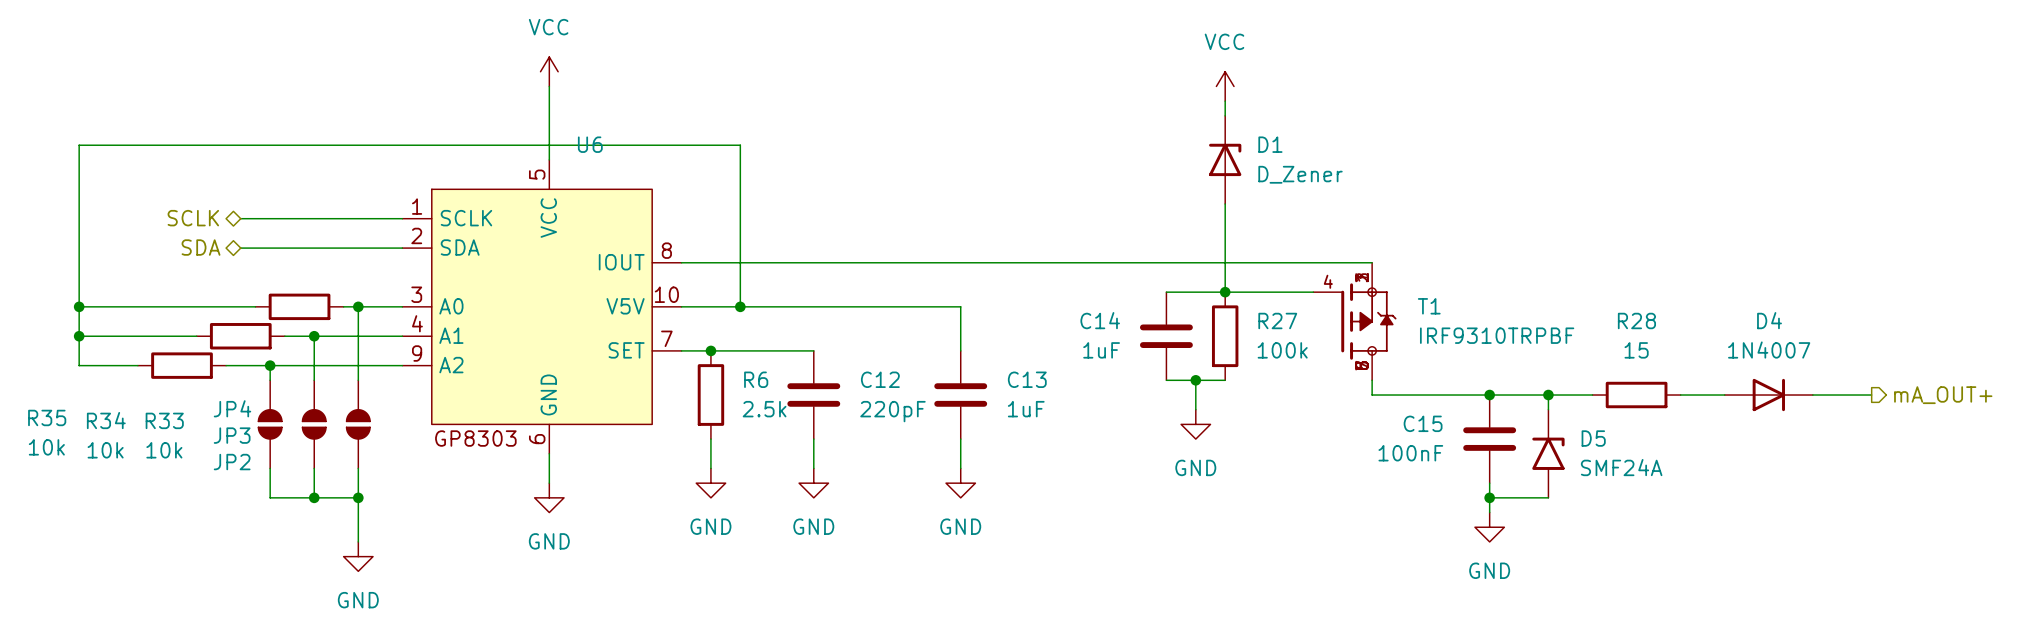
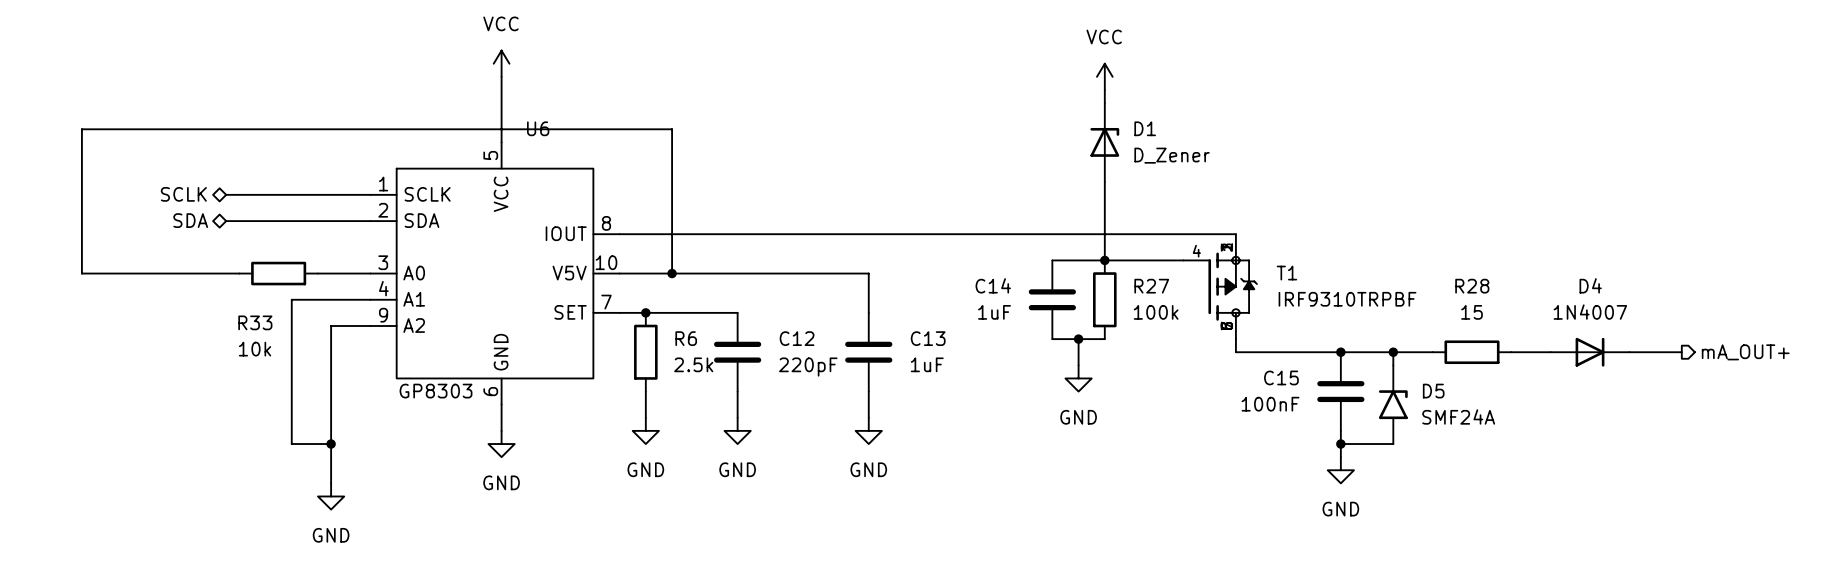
wire: (79, 306) (79, 365) (137, 365) -> none
junction: (79, 306) -> none
wire: (358, 306) (358, 365) (226, 365) -> none
junction: (358, 306) -> none
wire: (79, 336) (196, 336) -> none
junction: (79, 336) -> none
R34: 10k (240, 336) -> none
wire: (284, 336) (314, 336) -> none
junction: (314, 336) -> none
R35: 10k (182, 365) -> none
wire: (270, 365) (270, 380) -> none
junction: (270, 365) -> none
R33 name position: R33 (164, 420) -> R33 (255, 322)
JP4: (270, 424) -> none
JP3: (314, 424) -> none
JP2: (358, 424) -> none
R33 value position: 10k (164, 450) -> 10k (255, 349)
wire: (270, 468) (270, 497) (314, 497) -> none
junction: (314, 497) -> none

